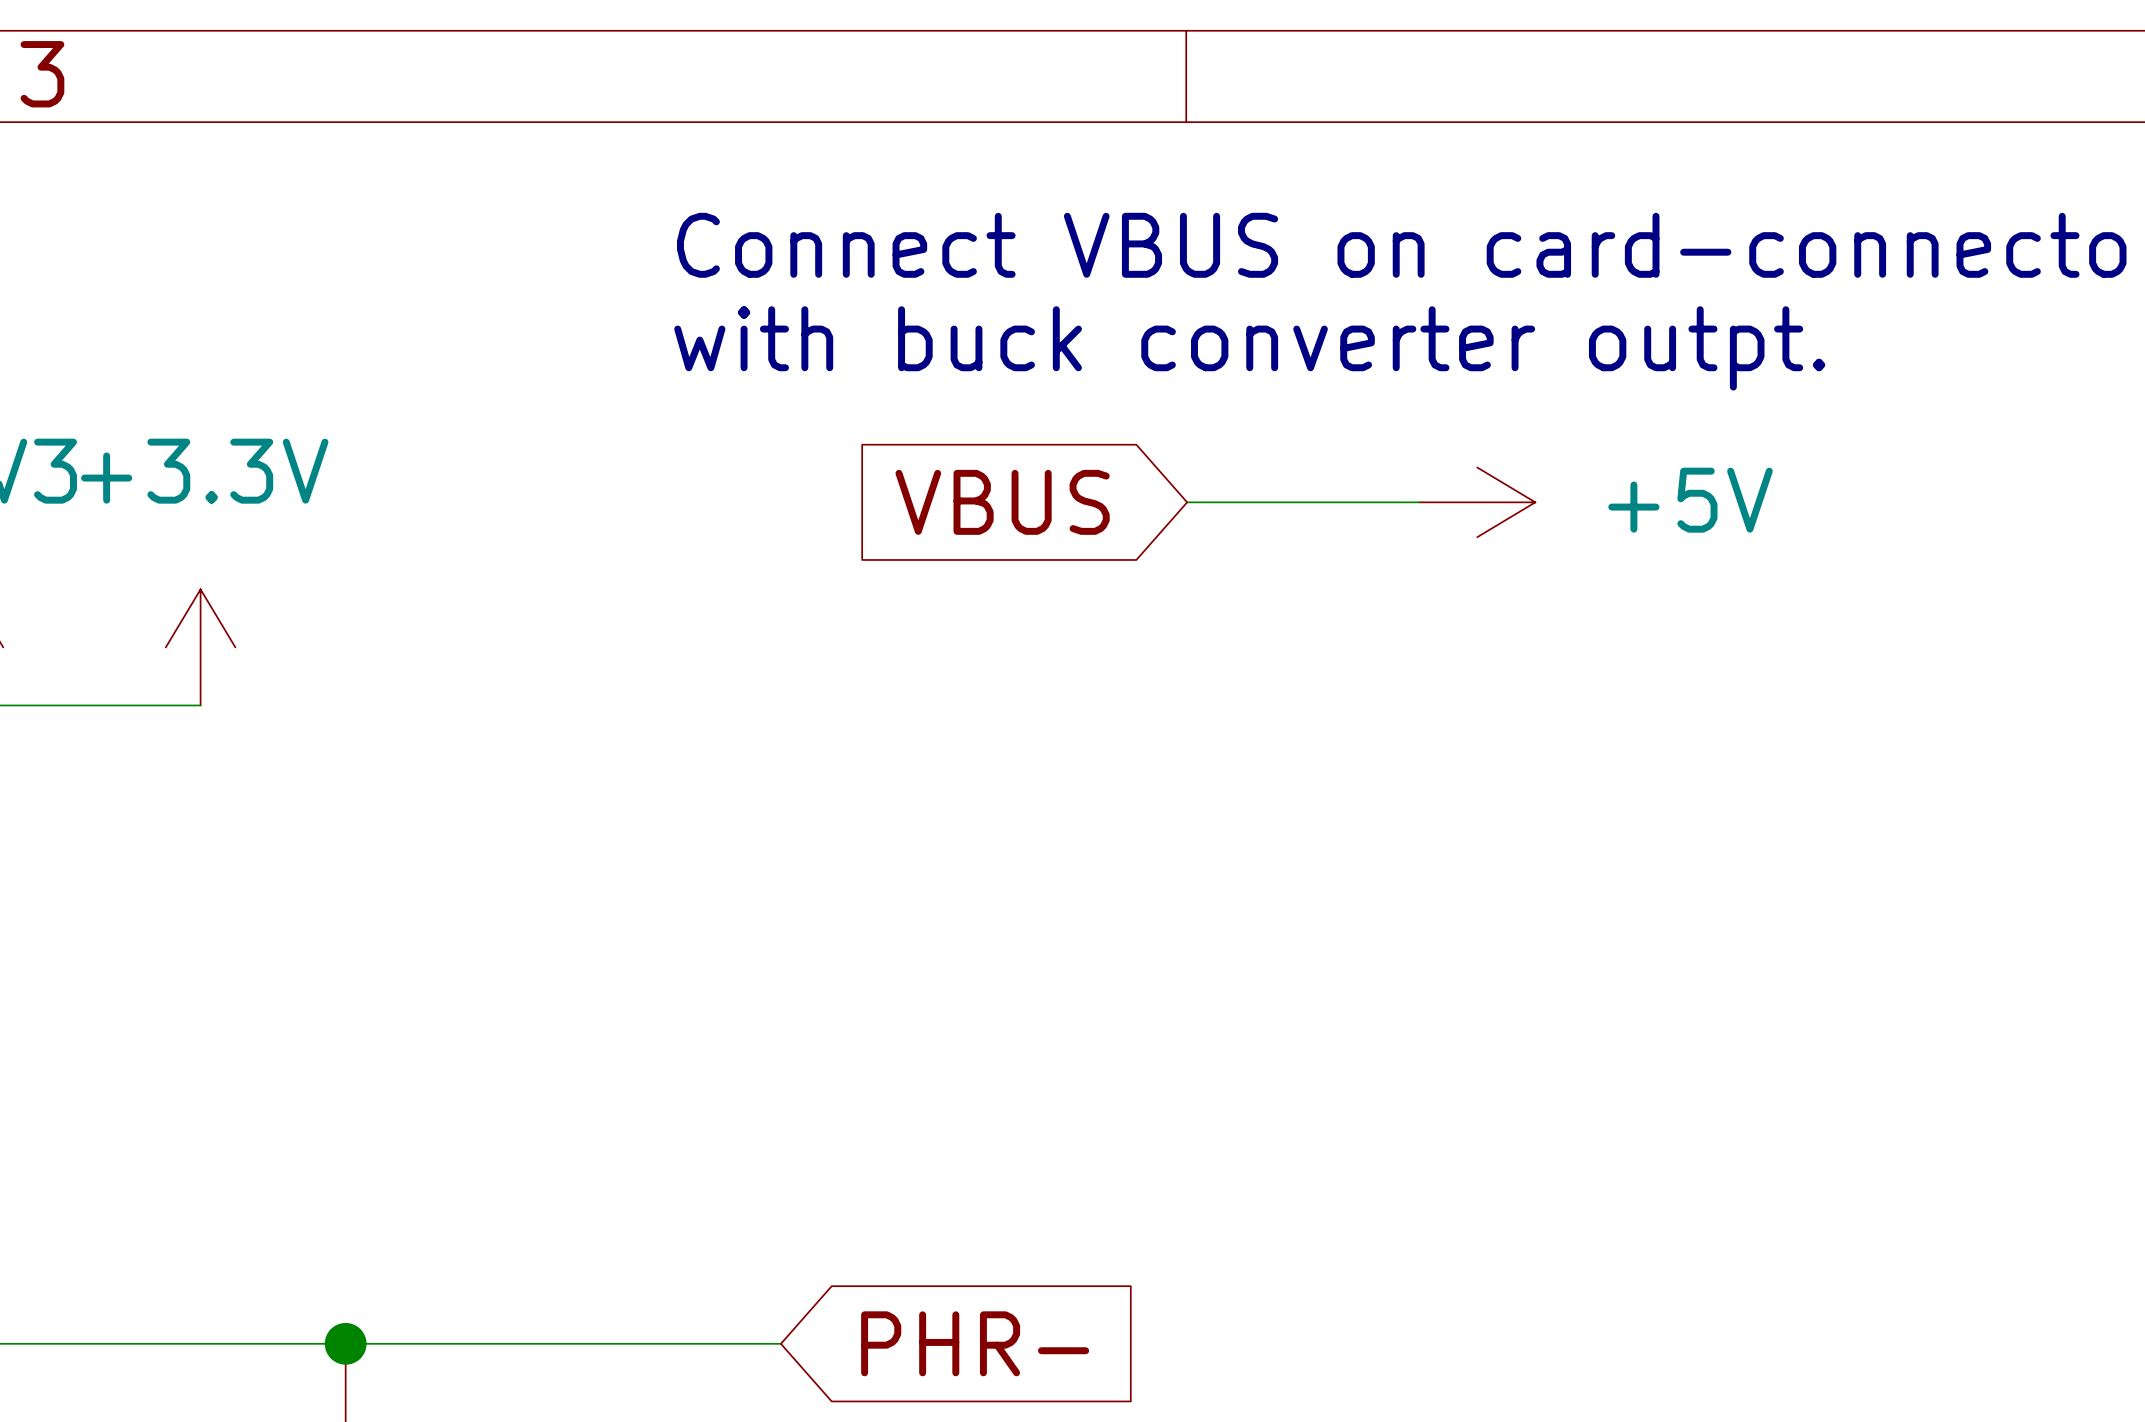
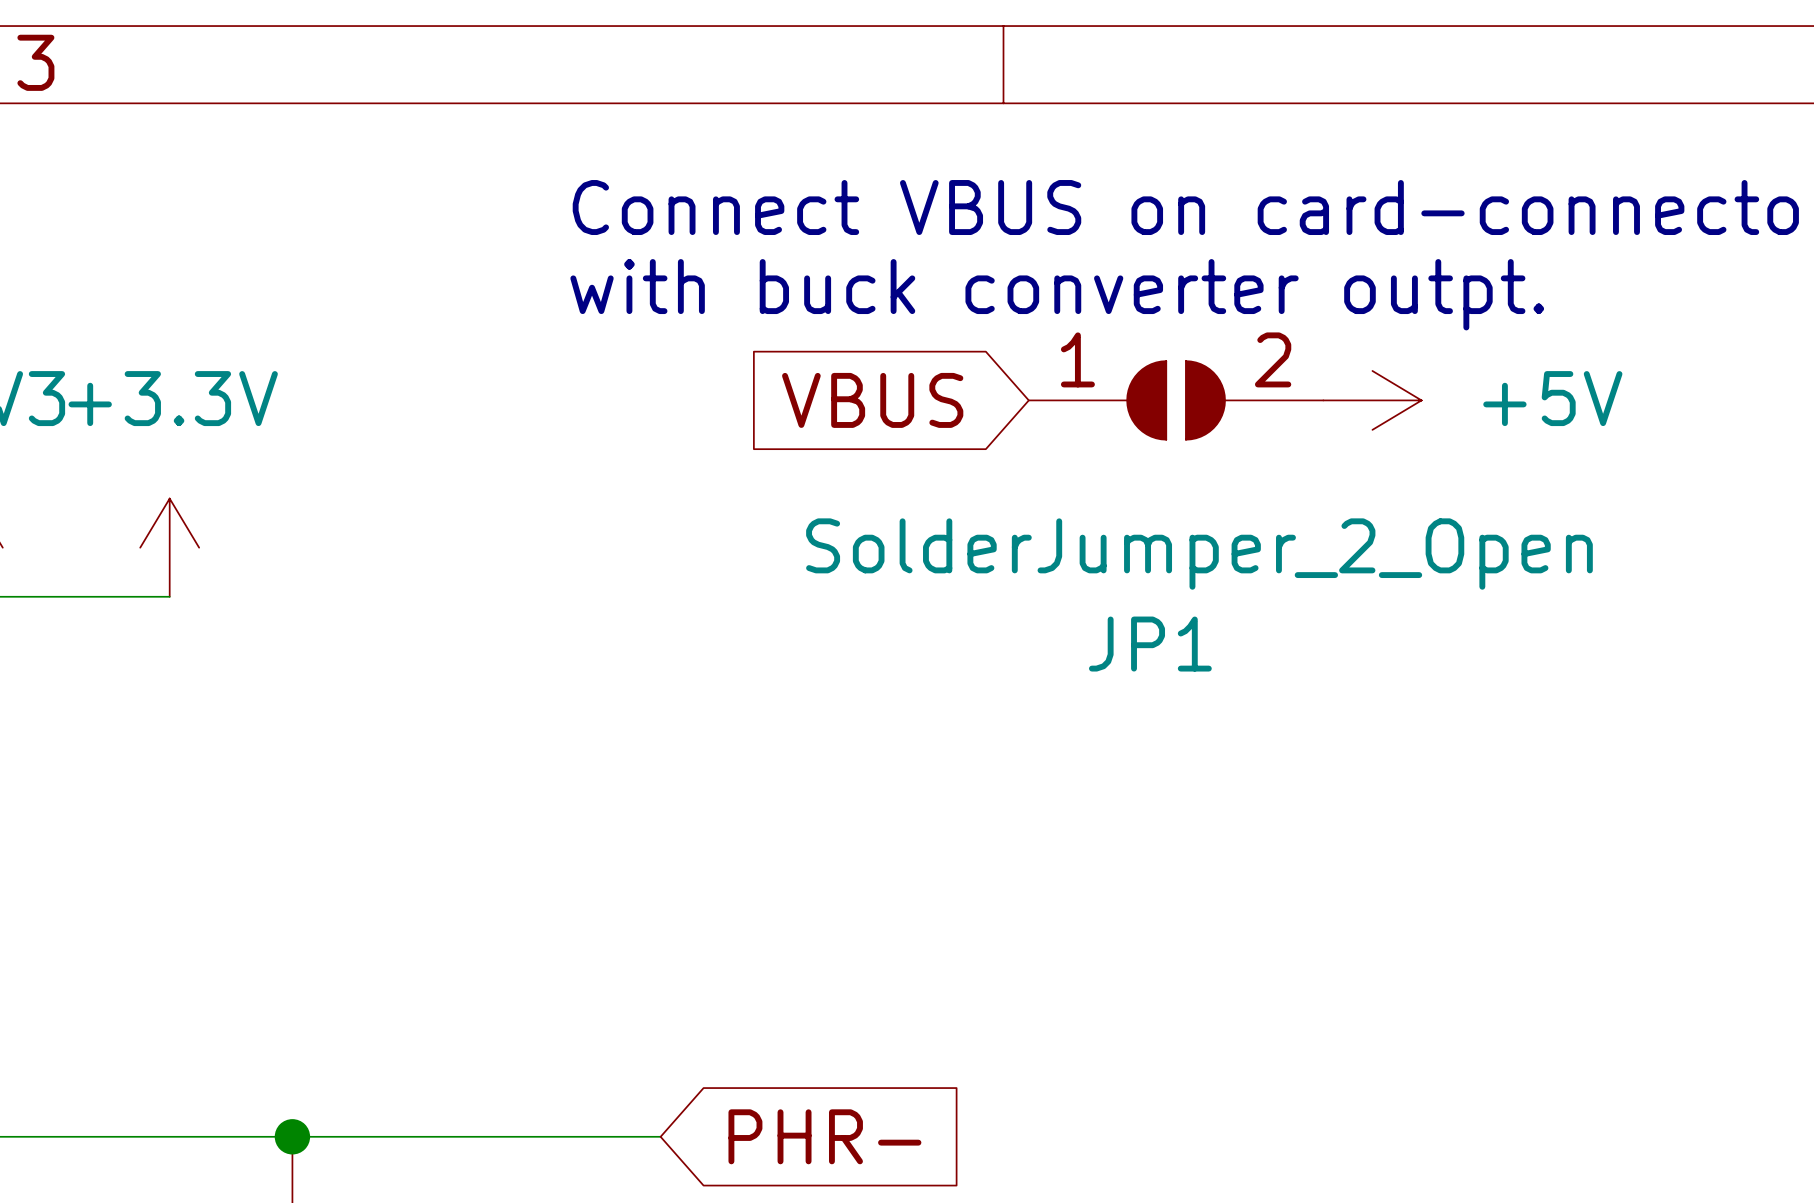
JP1: none -> SolderJumper_2_Open (1176, 400)
global label position: VBUS (1002, 502) -> VBUS (872, 400)
wire: (1187, 502) (1419, 502) -> none
power symbol position: +5V (1477, 502) -> +5V (1372, 400)

